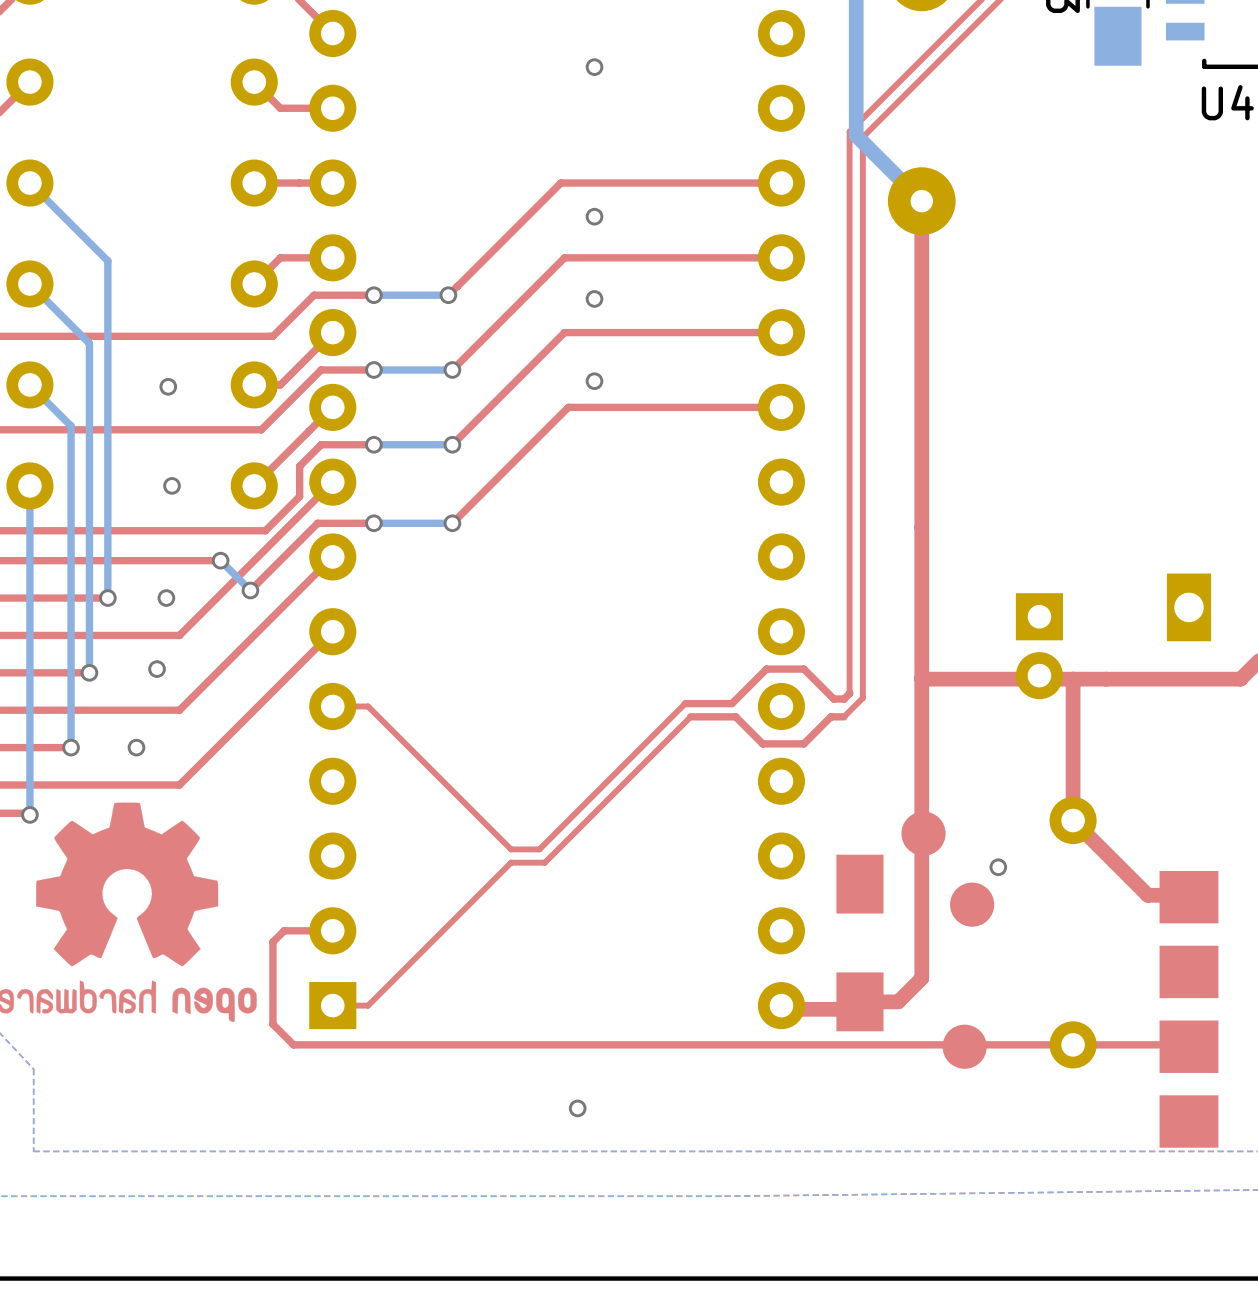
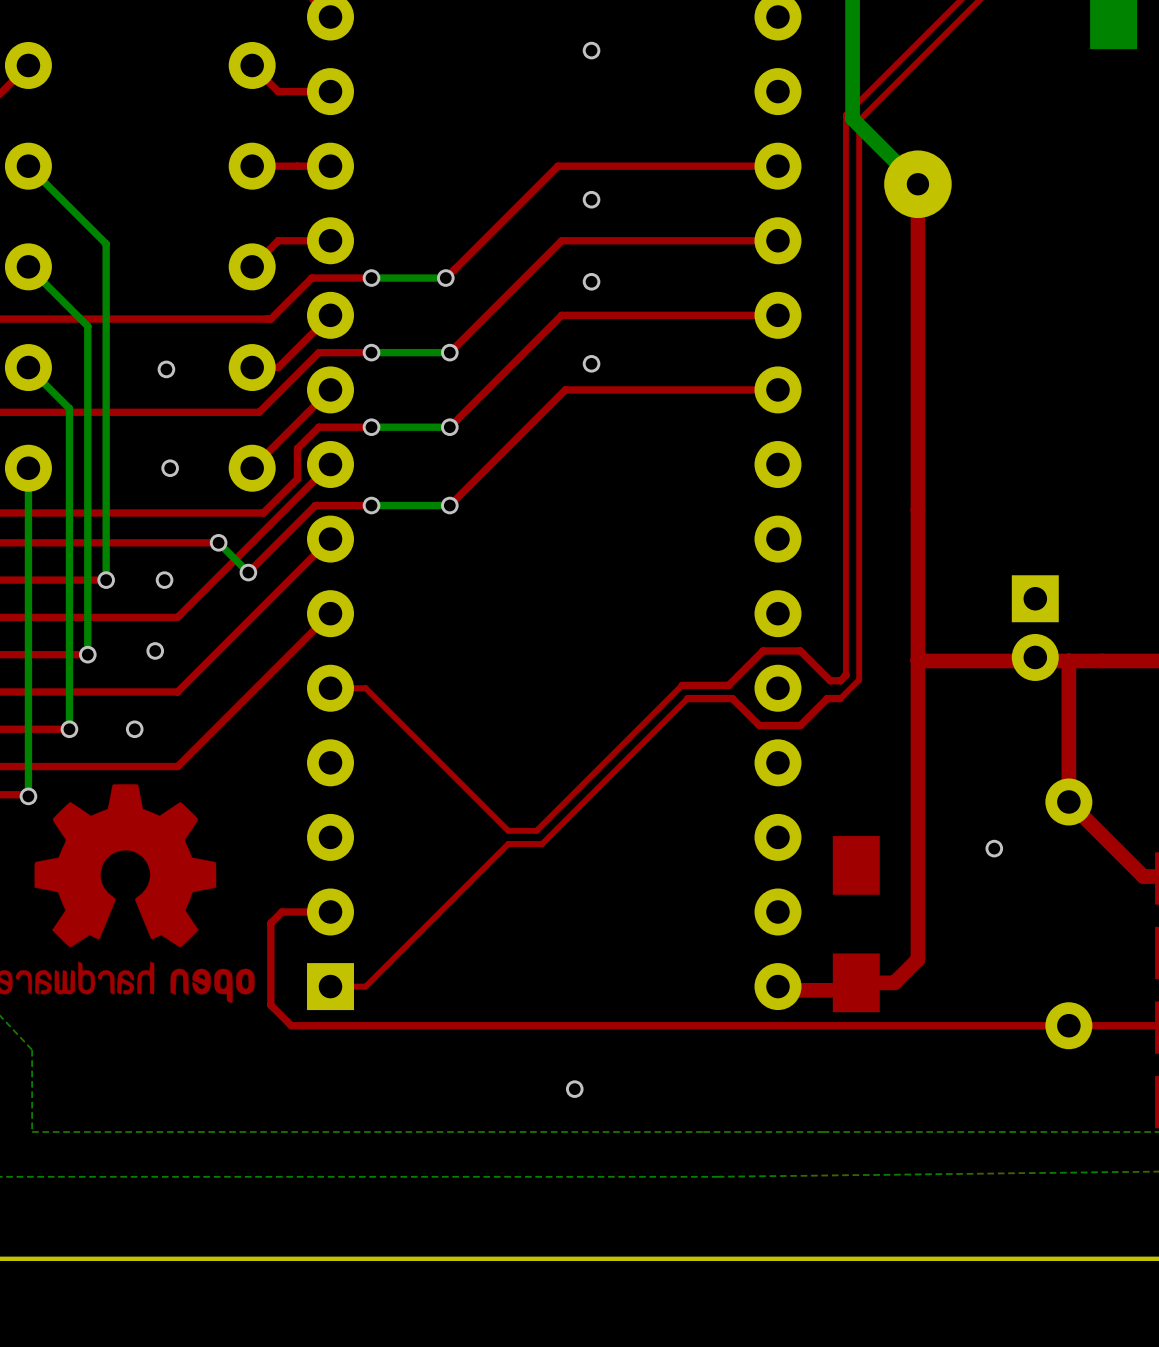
part: (923, 833) -> none
part: (972, 904) -> none
part: (964, 1046) -> none

